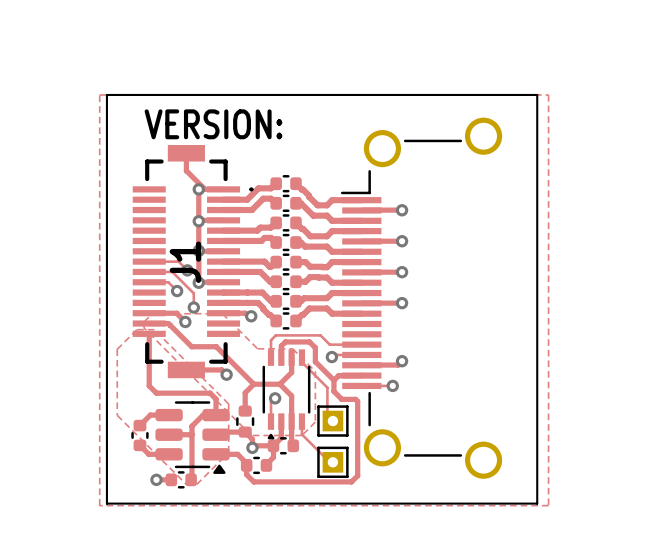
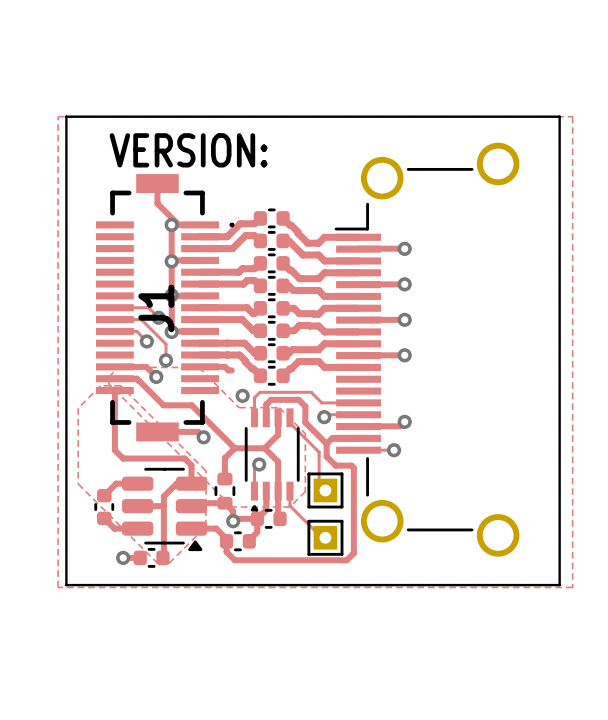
via position: (251, 316) -> (242, 395)

